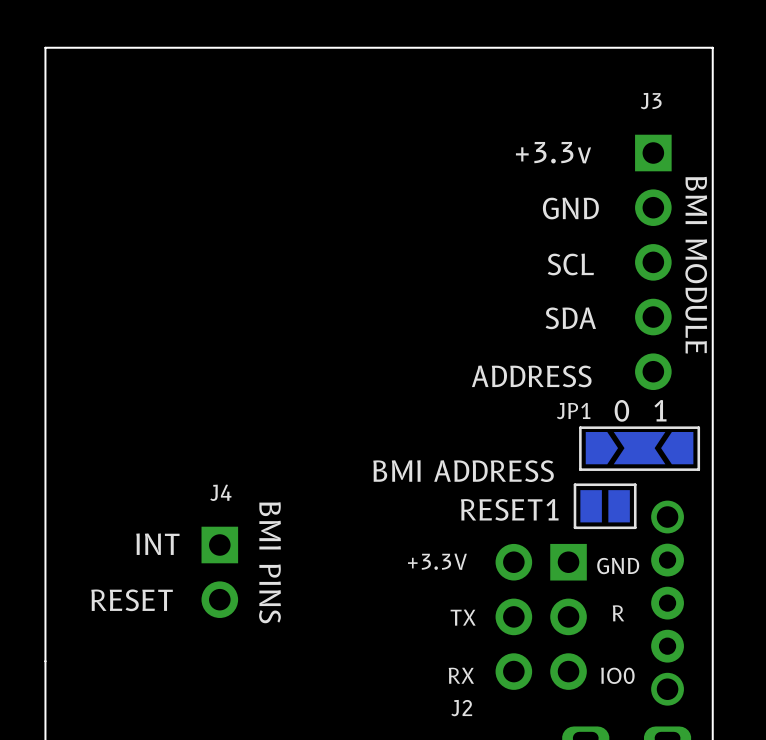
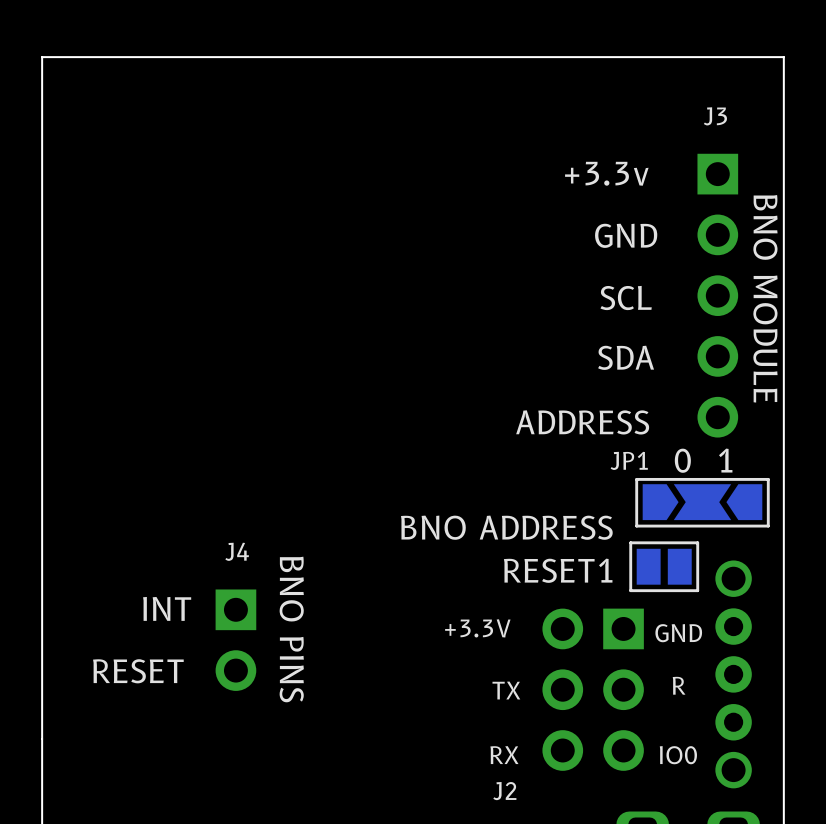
text: BMI MODULE (696, 265) -> BNO MODULE (765, 298)
text: BMI ADDRESS (463, 471) -> BNO ADDRESS (506, 527)
text: BMI PINS (270, 562) -> BNO PINS (291, 629)

